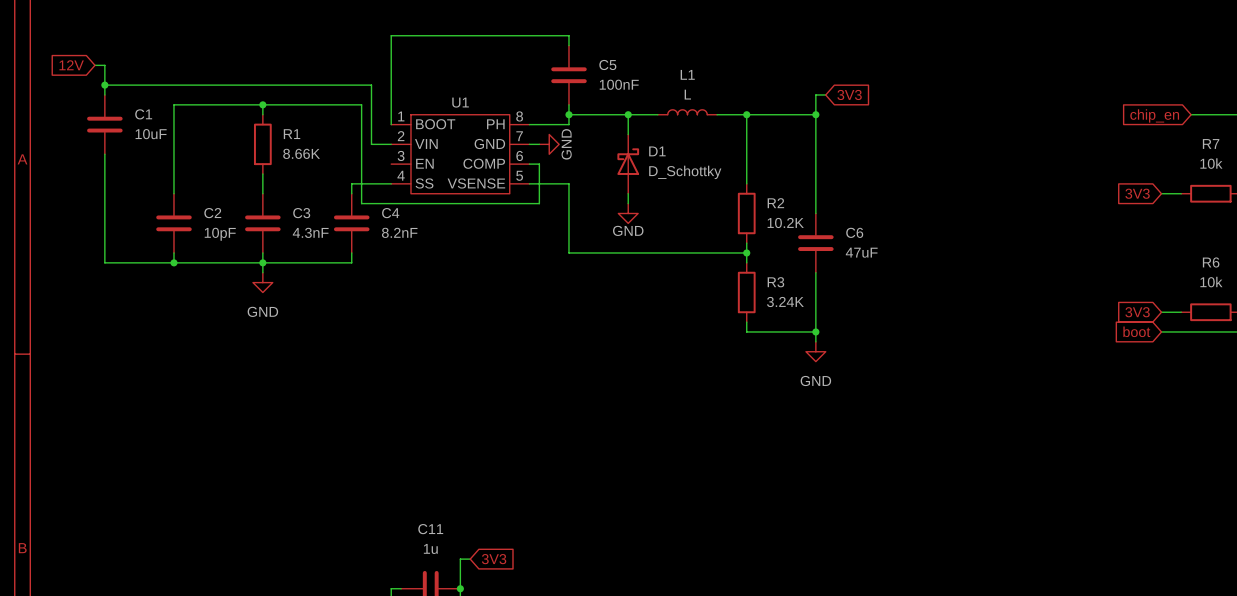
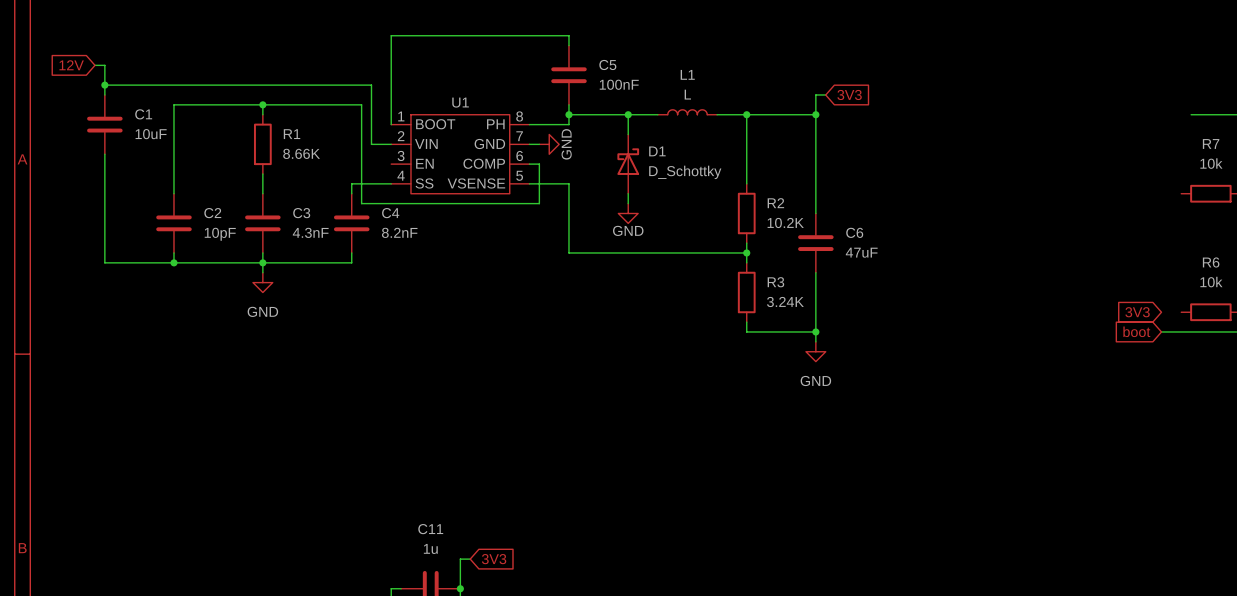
global label: chip_en (1154, 115) -> none
global label: 3V3 (1137, 193) -> none
wire: (1161, 193) (1181, 193) -> none
wire: (1161, 312) (1181, 312) -> none

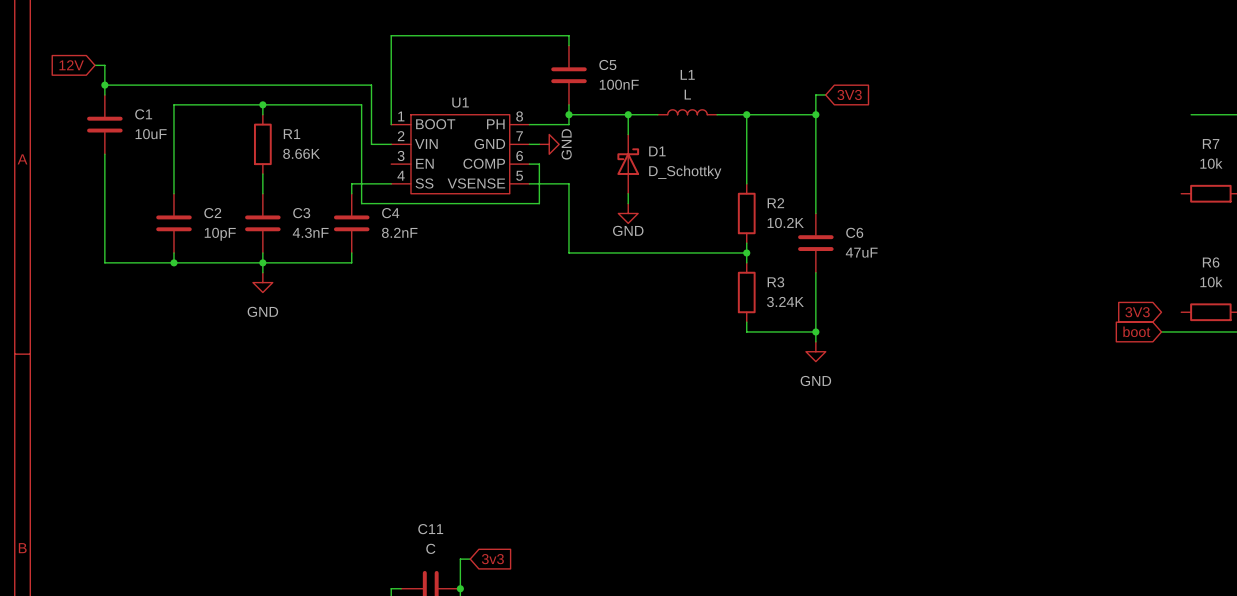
C11 value: 1u (430, 548) -> C (430, 548)
global label: 3V3 (494, 559) -> 3v3 (492, 559)

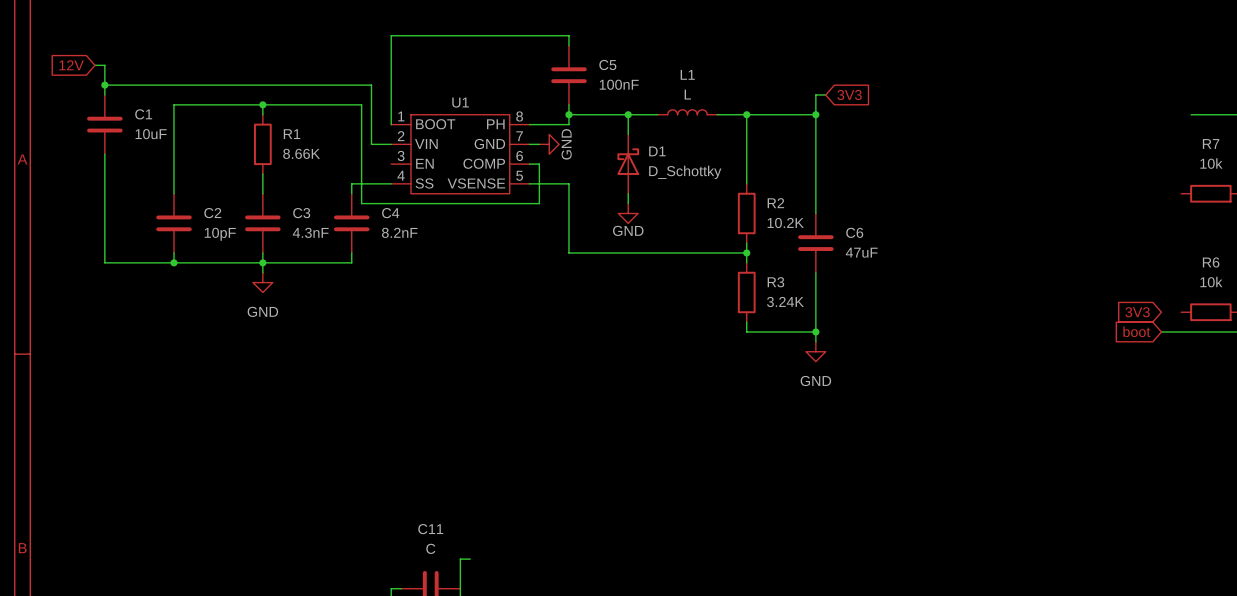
global label: 3v3 (492, 559) -> none
junction: (460, 588) -> none

